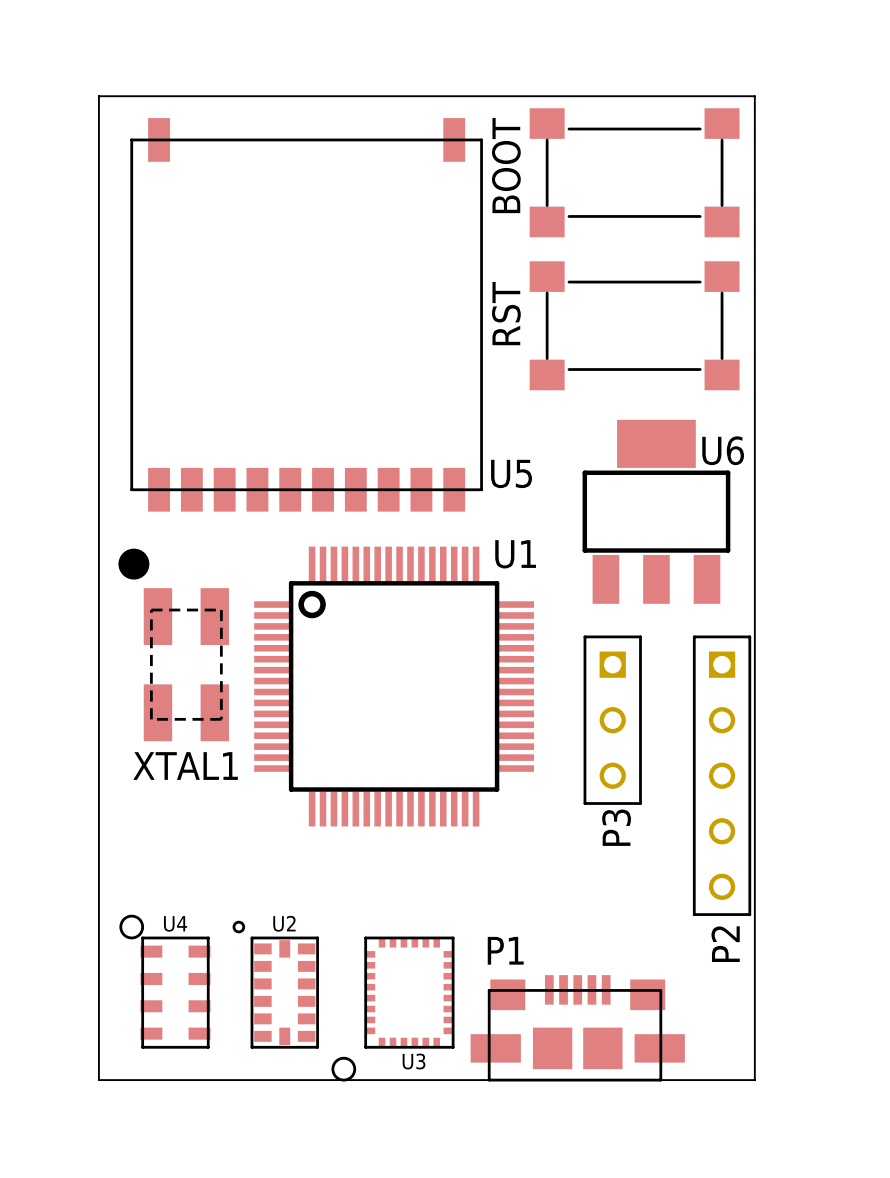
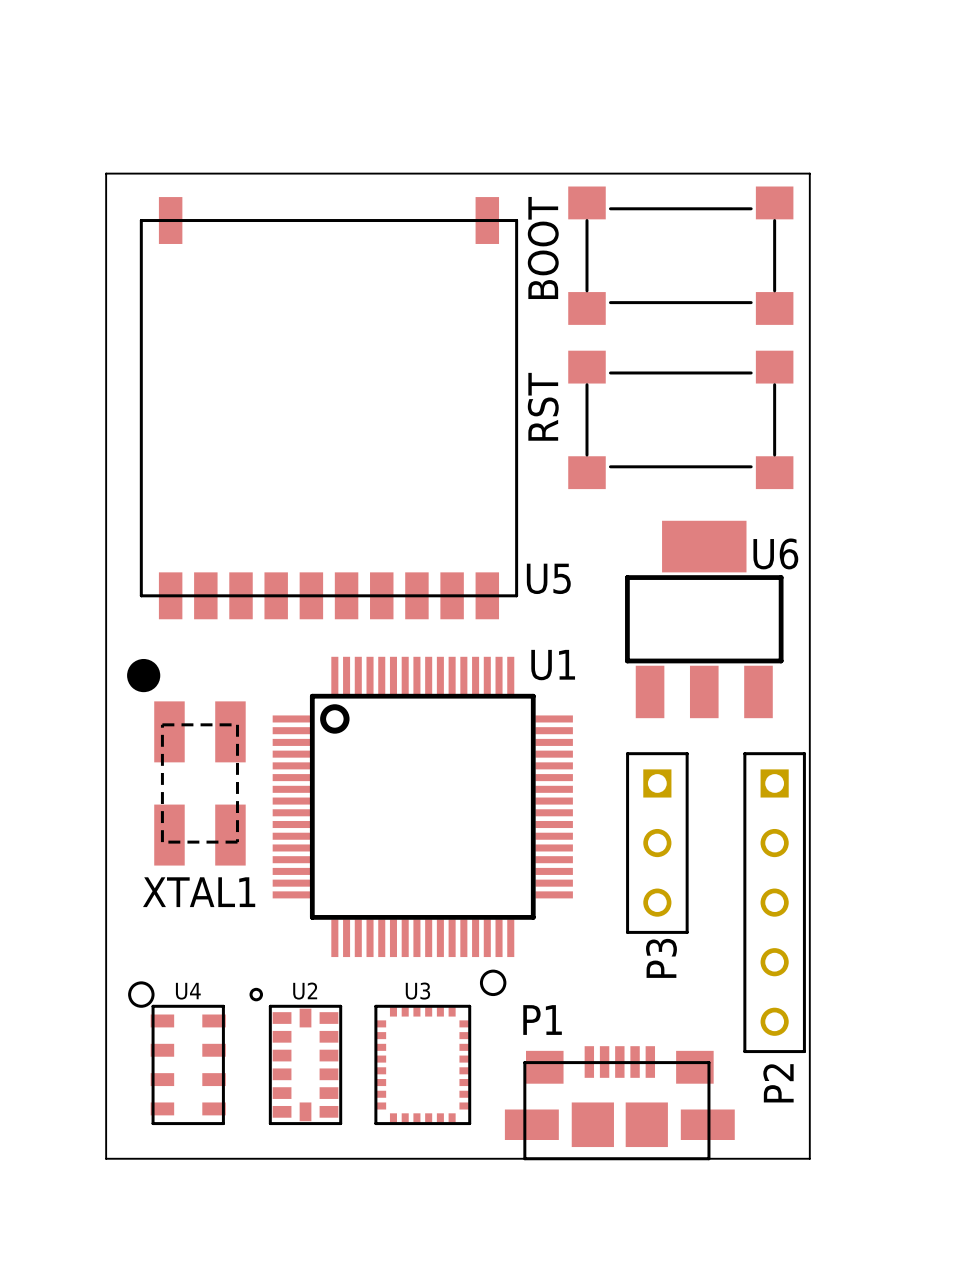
board edge: (98, 161) (98, 96) (754, 96) (754, 161) -> (106, 173) (809, 173)
BOOT position: (634, 172) -> (680, 255)
U5 position: (306, 314) -> (328, 408)
RST position: (634, 325) -> (680, 419)
U6 position: (656, 511) -> (704, 619)
XTAL1 position: (173, 644) -> (186, 762)
U1 position: (394, 686) -> (422, 806)
P3 position: (612, 720) -> (657, 843)
P2 position: (722, 775) -> (774, 902)
U3 rotation: 0° (392, 1009) -> 180° (440, 1047)

